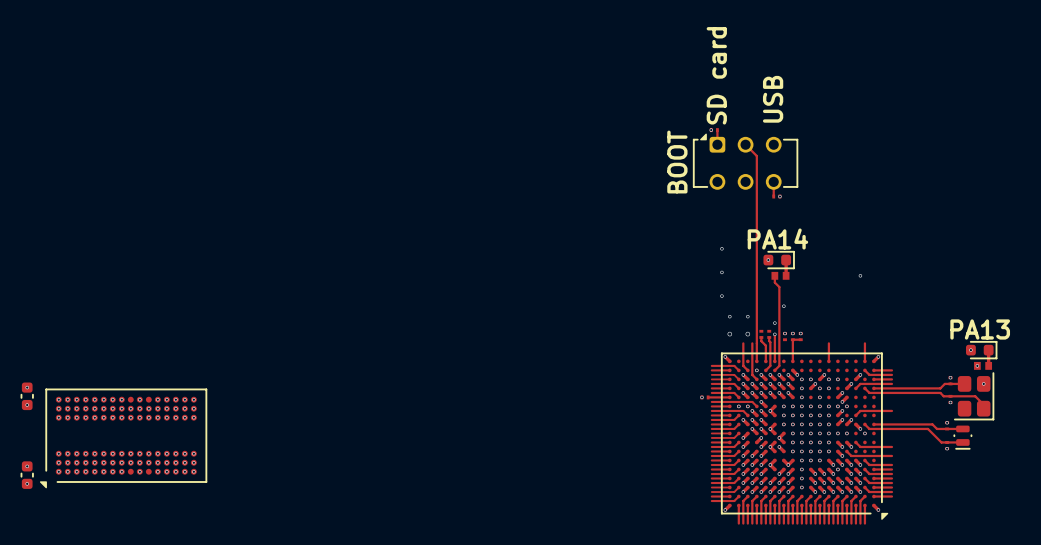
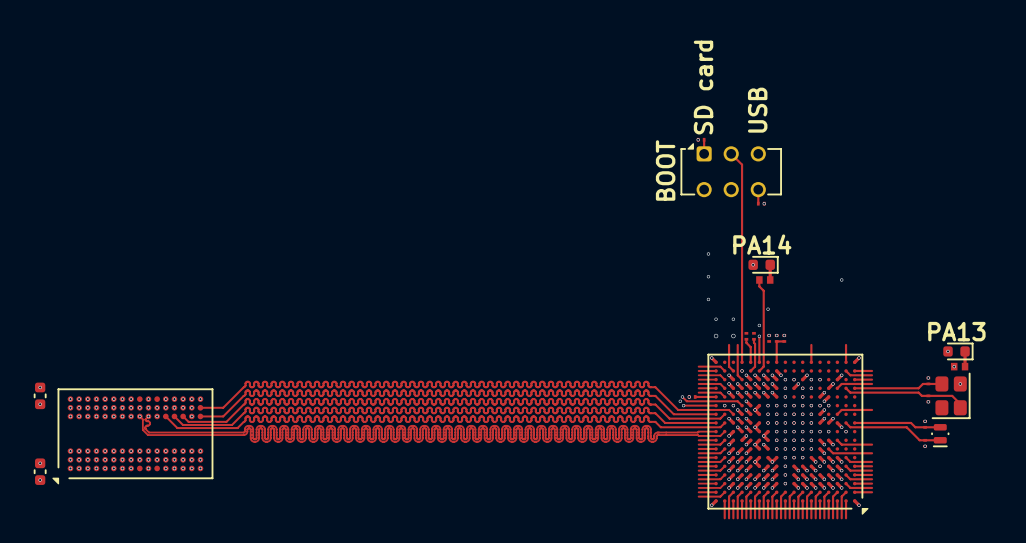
track: none -> (682, 396) (686, 401) (698, 401)
via: none -> (682, 396)
via: none -> (680, 401)
track: none -> (683, 405) (698, 405)
via: none -> (683, 405)
track: none -> (200, 407) (223, 407) (245, 386) (247, 381) (251, 387) (255, 381) (260, 387) (264, 381) (268, 387) (273, 381) (277, 387) (281, 381) (286, 387) (290, 381) (294, 387) (299, 381) (303, 387) (307, 381) (312, 387) (316, 381) (320, 387) (325, 381) (329, 387) (333, 381) (338, 387) (342, 381) (346, 387) (351, 381) (355, 387) (359, 381) (364, 387) (368, 381) (372, 387) (377, 381) (381, 387) (385, 381) (390, 387) (394, 381) (398, 387) (403, 381) (407, 387) (411, 381) (416, 387) (420, 381) (424, 387) (429, 381) (433, 387) (437, 381) (442, 387) (446, 381) (450, 387) (455, 381) (459, 387) (463, 381) (468, 387) (472, 381) (476, 387) (481, 381) (485, 387) (489, 381) (494, 387) (498, 381) (502, 387) (507, 381) (511, 387) (515, 381) (520, 387) (524, 381) (528, 387) (533, 381) (537, 387) (541, 381) (546, 387) (550, 381) (554, 387) (559, 381) (563, 387) (567, 381) (571, 387) (576, 381) (580, 387) (585, 381) (589, 387) (591, 386) (593, 381) (596, 382) (596, 386) (599, 387) (603, 381) (607, 387) (612, 381) (616, 387) (620, 381) (625, 387) (629, 381) (633, 387) (638, 381) (642, 387) (646, 381) (648, 386) (655, 387) (678, 409) (698, 409)
via: (193, 408) -> none
track: none -> (698, 414) (673, 414) (655, 395) (648, 395) (646, 390) (642, 395) (638, 390) (633, 395) (629, 390) (625, 395) (620, 390) (616, 395) (612, 390) (607, 395) (603, 390) (599, 395) (594, 390) (590, 395) (586, 390) (581, 395) (577, 390) (573, 395) (568, 390) (564, 395) (560, 390) (555, 395) (551, 390) (547, 395) (542, 390) (538, 395) (534, 390) (529, 395) (525, 390) (521, 395) (516, 390) (512, 395) (508, 390) (503, 395) (499, 390) (495, 395) (490, 390) (486, 395) (482, 390) (477, 395) (473, 390) (469, 395) (464, 390) (460, 395) (456, 390) (451, 395) (447, 390) (443, 395) (438, 390) (434, 395) (430, 390) (425, 395) (421, 390) (417, 395) (412, 390) (408, 395) (404, 390) (399, 395) (395, 390) (391, 395) (386, 390) (382, 395) (378, 390) (373, 395) (369, 390) (365, 395) (360, 390) (356, 395) (352, 390) (347, 395) (343, 390) (339, 395) (334, 390) (330, 395) (326, 390) (321, 395) (317, 390) (313, 395) (308, 390) (304, 395) (300, 390) (296, 395) (291, 390) (287, 395) (285, 395) (282, 390) (280, 391) (279, 395) (276, 395) (273, 390) (268, 395) (264, 390) (260, 395) (255, 390) (251, 395) (247, 390) (245, 395) (223, 416) (200, 416)
track: none -> (139, 416) (142, 419) (142, 429) (147, 435) (243, 435) (249, 428) (250, 439) (254, 441) (258, 439) (260, 428) (262, 429) (262, 439) (266, 441) (270, 439) (271, 428) (274, 429) (274, 439) (277, 441) (282, 439) (283, 428) (285, 429) (286, 439) (289, 441) (293, 439) (295, 428) (297, 429) (297, 439) (301, 441) (305, 439) (306, 428) (309, 429) (309, 439) (312, 441) (317, 439) (318, 428) (320, 429) (321, 439) (324, 441) (328, 439) (330, 428) (332, 429) (332, 439) (336, 441) (340, 439) (342, 428) (344, 429) (344, 439) (347, 441) (352, 439) (353, 428) (355, 429) (356, 439) (359, 441) (364, 439) (365, 428) (367, 429) (367, 439) (371, 441) (375, 439) (377, 428) (379, 429) (379, 439) (382, 441) (387, 439) (388, 428) (391, 429) (391, 439) (394, 441) (399, 439) (400, 428) (402, 429) (403, 439) (406, 441) (410, 439) (412, 428) (414, 429) (414, 439) (418, 441) (422, 439) (423, 428) (426, 429) (426, 439) (429, 441) (434, 439) (435, 428) (437, 429) (438, 439) (441, 441) (445, 439) (447, 428) (449, 429) (449, 439) (453, 441) (457, 439) (458, 428) (461, 429) (461, 439) (464, 441) (469, 439) (470, 428) (472, 429) (473, 439) (476, 441) (480, 439) (482, 428) (484, 429) (484, 439) (488, 441) (492, 439) (494, 428) (496, 429) (496, 439) (499, 441) (504, 439) (505, 428) (507, 429) (508, 439) (511, 441) (516, 439) (517, 428) (519, 429) (519, 439) (523, 441) (527, 439) (529, 428) (531, 429) (531, 439) (534, 441) (539, 439) (540, 428) (543, 429) (543, 439) (546, 441) (551, 439) (552, 428) (554, 429) (555, 439) (558, 441) (562, 439) (564, 428) (566, 429) (566, 439) (570, 441) (574, 439) (575, 428) (578, 429) (578, 439) (581, 441) (586, 439) (587, 428) (589, 429) (590, 439) (592, 441) (597, 439) (599, 428) (601, 429) (601, 439) (604, 441) (609, 439) (610, 428) (613, 429) (613, 439) (616, 441) (621, 439) (622, 428) (624, 429) (625, 439) (628, 441) (633, 439) (634, 428) (636, 429) (636, 439) (639, 441) (644, 439) (645, 428) (648, 429) (648, 439) (651, 441) (655, 440) (657, 435) (698, 435)
track: none -> (148, 416) (145, 419) (149, 424) (145, 426) (145, 428) (148, 432) (243, 432) (245, 427) (249, 425) (252, 428) (254, 439) (256, 438) (256, 428) (260, 425) (264, 428) (266, 439) (268, 438) (268, 428) (271, 425) (276, 428) (277, 439) (279, 438) (280, 428) (283, 425) (288, 428) (289, 439) (291, 438) (291, 428) (295, 425) (299, 428) (301, 439) (303, 438) (303, 428) (306, 425) (311, 428) (312, 439) (315, 438) (315, 428) (318, 425) (323, 428) (324, 439) (326, 438) (327, 428) (330, 425) (334, 428) (336, 439) (338, 438) (338, 428) (342, 425) (346, 428) (347, 439) (350, 438) (350, 428) (353, 425) (358, 428) (359, 439) (361, 438) (362, 428) (365, 425) (369, 428) (371, 439) (373, 438) (373, 428) (377, 425) (381, 428) (382, 439) (385, 438) (385, 428) (388, 425) (393, 428) (394, 439) (396, 438) (397, 428) (400, 425) (404, 428) (406, 439) (408, 438) (408, 428) (412, 425) (416, 428) (418, 439) (420, 438) (420, 428) (423, 425) (428, 428) (429, 439) (431, 438) (432, 428) (435, 425) (440, 428) (441, 439) (443, 438) (443, 428) (447, 425) (451, 428) (453, 439) (455, 438) (455, 428) (458, 425) (463, 428) (464, 439) (467, 438) (467, 428) (470, 425) (475, 428) (476, 439) (478, 438) (479, 428) (482, 425) (486, 428) (488, 439) (490, 438) (490, 428) (494, 425) (498, 428) (499, 439) (502, 438) (502, 428) (505, 425) (510, 428) (511, 439) (513, 438) (514, 428) (517, 425) (521, 428) (523, 439) (525, 438) (525, 428) (529, 425) (533, 428) (534, 439) (537, 438) (537, 428) (540, 425) (545, 428) (546, 439) (548, 438) (549, 428) (552, 425) (557, 428) (558, 439) (560, 438) (560, 428) (564, 425) (568, 428) (570, 439) (572, 438) (572, 428) (575, 425) (580, 428) (581, 439) (583, 438) (584, 428) (587, 425) (592, 428) (593, 439) (595, 438) (595, 428) (598, 425) (603, 428) (605, 439) (607, 438) (607, 428) (610, 425) (615, 428) (616, 439) (619, 438) (619, 428) (622, 425) (627, 428) (628, 439) (630, 438) (630, 428) (633, 425) (638, 428) (640, 439) (642, 438) (642, 428) (645, 425) (650, 428) (651, 439) (657, 432) (698, 431)
track: none -> (165, 416) (177, 428) (237, 428) (247, 416) (251, 421) (255, 416) (260, 421) (264, 416) (268, 421) (273, 416) (277, 421) (281, 416) (286, 421) (290, 416) (294, 421) (299, 416) (303, 421) (307, 416) (312, 421) (316, 416) (320, 421) (325, 416) (329, 421) (333, 416) (338, 421) (342, 416) (346, 421) (351, 416) (355, 421) (359, 416) (364, 421) (368, 416) (372, 421) (377, 416) (381, 421) (385, 416) (390, 421) (394, 416) (398, 421) (403, 416) (407, 421) (411, 416) (416, 421) (420, 416) (424, 421) (429, 416) (433, 421) (437, 416) (442, 421) (446, 416) (450, 421) (455, 416) (459, 421) (463, 416) (468, 421) (472, 416) (476, 421) (481, 416) (485, 421) (489, 416) (494, 421) (498, 416) (502, 421) (507, 416) (511, 421) (515, 416) (520, 421) (524, 416) (528, 421) (533, 416) (537, 421) (541, 416) (546, 421) (550, 416) (554, 421) (559, 416) (563, 421) (567, 416) (572, 421) (576, 416) (580, 421) (584, 416) (589, 421) (593, 416) (595, 416) (596, 421) (599, 421) (601, 416) (603, 416) (607, 421) (612, 416) (616, 421) (620, 416) (625, 421) (629, 416) (633, 421) (638, 416) (642, 421) (646, 416) (649, 421) (655, 421) (660, 427) (698, 427)
via: (157, 417) -> none
track: none -> (174, 416) (182, 424) (232, 424) (245, 412) (247, 407) (251, 413) (255, 407) (260, 413) (264, 407) (268, 413) (273, 407) (277, 413) (281, 407) (286, 413) (290, 407) (294, 413) (299, 407) (303, 413) (307, 407) (312, 413) (316, 407) (320, 413) (325, 407) (329, 413) (333, 407) (338, 413) (342, 407) (346, 413) (351, 407) (355, 413) (359, 407) (364, 413) (368, 407) (372, 413) (377, 407) (381, 413) (385, 407) (390, 413) (394, 407) (398, 413) (403, 407) (407, 413) (411, 407) (416, 413) (420, 407) (424, 413) (429, 407) (433, 413) (437, 407) (442, 413) (446, 407) (450, 413) (455, 407) (459, 413) (463, 407) (468, 413) (472, 407) (476, 413) (481, 407) (485, 413) (489, 407) (494, 413) (498, 407) (502, 413) (507, 407) (511, 413) (515, 407) (520, 413) (524, 407) (528, 413) (533, 407) (537, 413) (541, 407) (546, 413) (550, 407) (554, 413) (559, 407) (563, 413) (567, 407) (572, 413) (576, 407) (580, 413) (584, 407) (589, 413) (593, 407) (598, 413) (602, 407) (606, 413) (610, 407) (615, 413) (619, 407) (621, 408) (624, 413) (626, 412) (627, 408) (630, 407) (633, 413) (638, 407) (642, 413) (646, 407) (649, 412) (655, 413) (665, 422) (698, 422)
via: (166, 417) -> none
track: none -> (183, 416) (188, 421) (226, 421) (245, 404) (247, 399) (251, 404) (255, 399) (260, 404) (264, 399) (268, 404) (273, 399) (277, 404) (281, 399) (286, 404) (290, 399) (294, 404) (299, 399) (303, 404) (307, 399) (312, 404) (316, 399) (320, 404) (325, 399) (329, 404) (333, 399) (338, 404) (342, 399) (346, 404) (351, 399) (355, 404) (359, 399) (364, 404) (368, 399) (372, 404) (377, 399) (381, 404) (385, 399) (390, 404) (394, 399) (398, 404) (403, 399) (407, 404) (411, 399) (416, 404) (420, 399) (424, 404) (429, 399) (433, 404) (437, 399) (442, 404) (446, 399) (450, 404) (455, 399) (459, 404) (463, 399) (468, 404) (472, 399) (476, 404) (481, 399) (485, 404) (489, 399) (494, 404) (498, 399) (502, 404) (507, 399) (511, 404) (515, 399) (520, 404) (524, 399) (528, 404) (533, 399) (537, 404) (541, 399) (546, 404) (550, 399) (554, 404) (559, 399) (563, 404) (567, 399) (571, 404) (576, 399) (580, 404) (585, 399) (589, 404) (593, 399) (597, 404) (602, 399) (606, 404) (611, 399) (615, 404) (617, 404) (619, 399) (622, 399) (622, 404) (625, 404) (629, 399) (633, 404) (638, 399) (642, 404) (646, 399) (649, 404) (655, 404) (669, 418) (698, 418)
via: (175, 417) -> none
via: (193, 417) -> none

